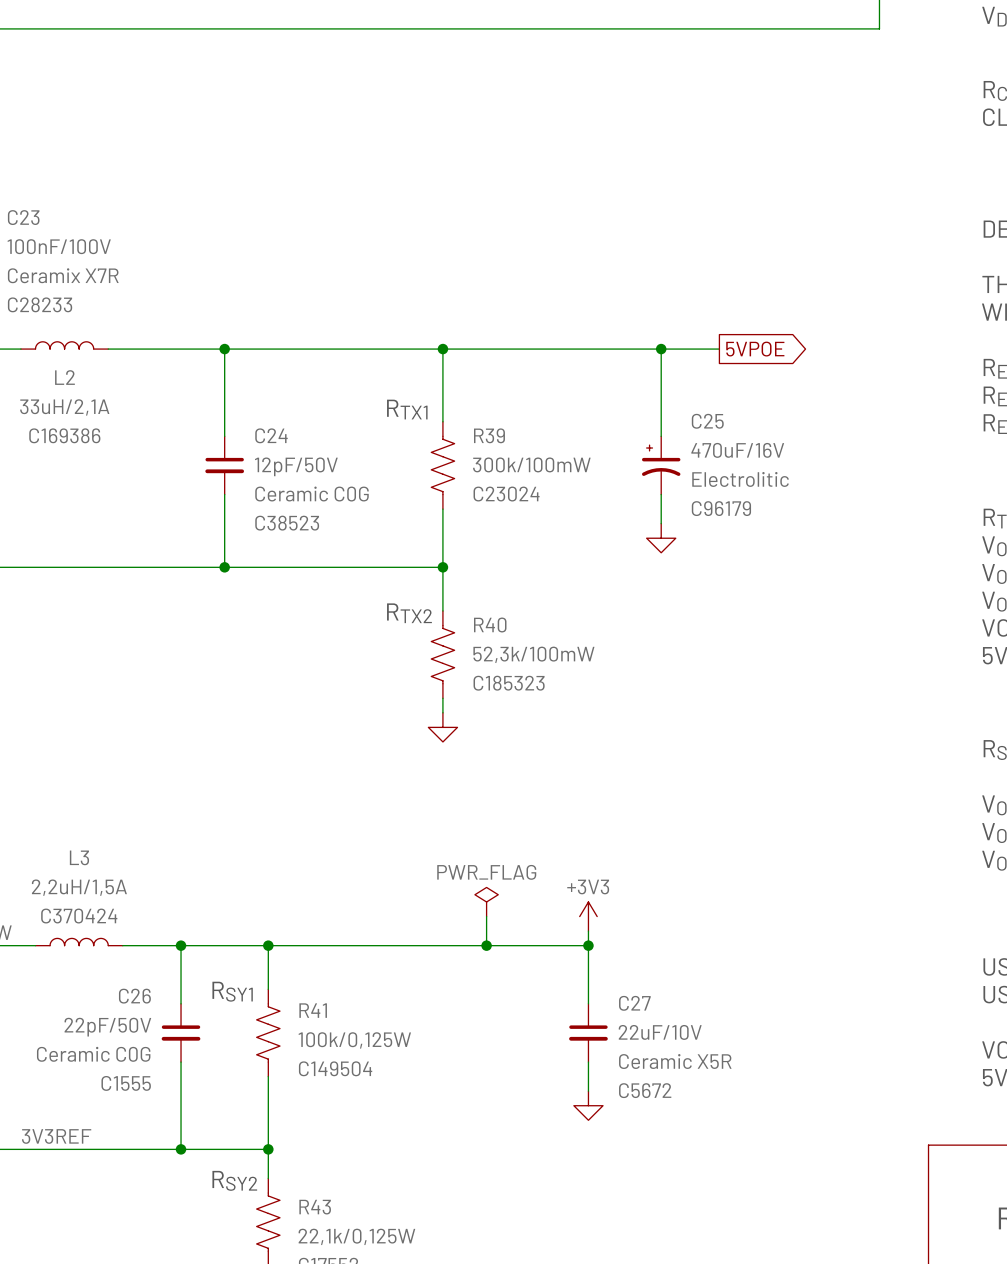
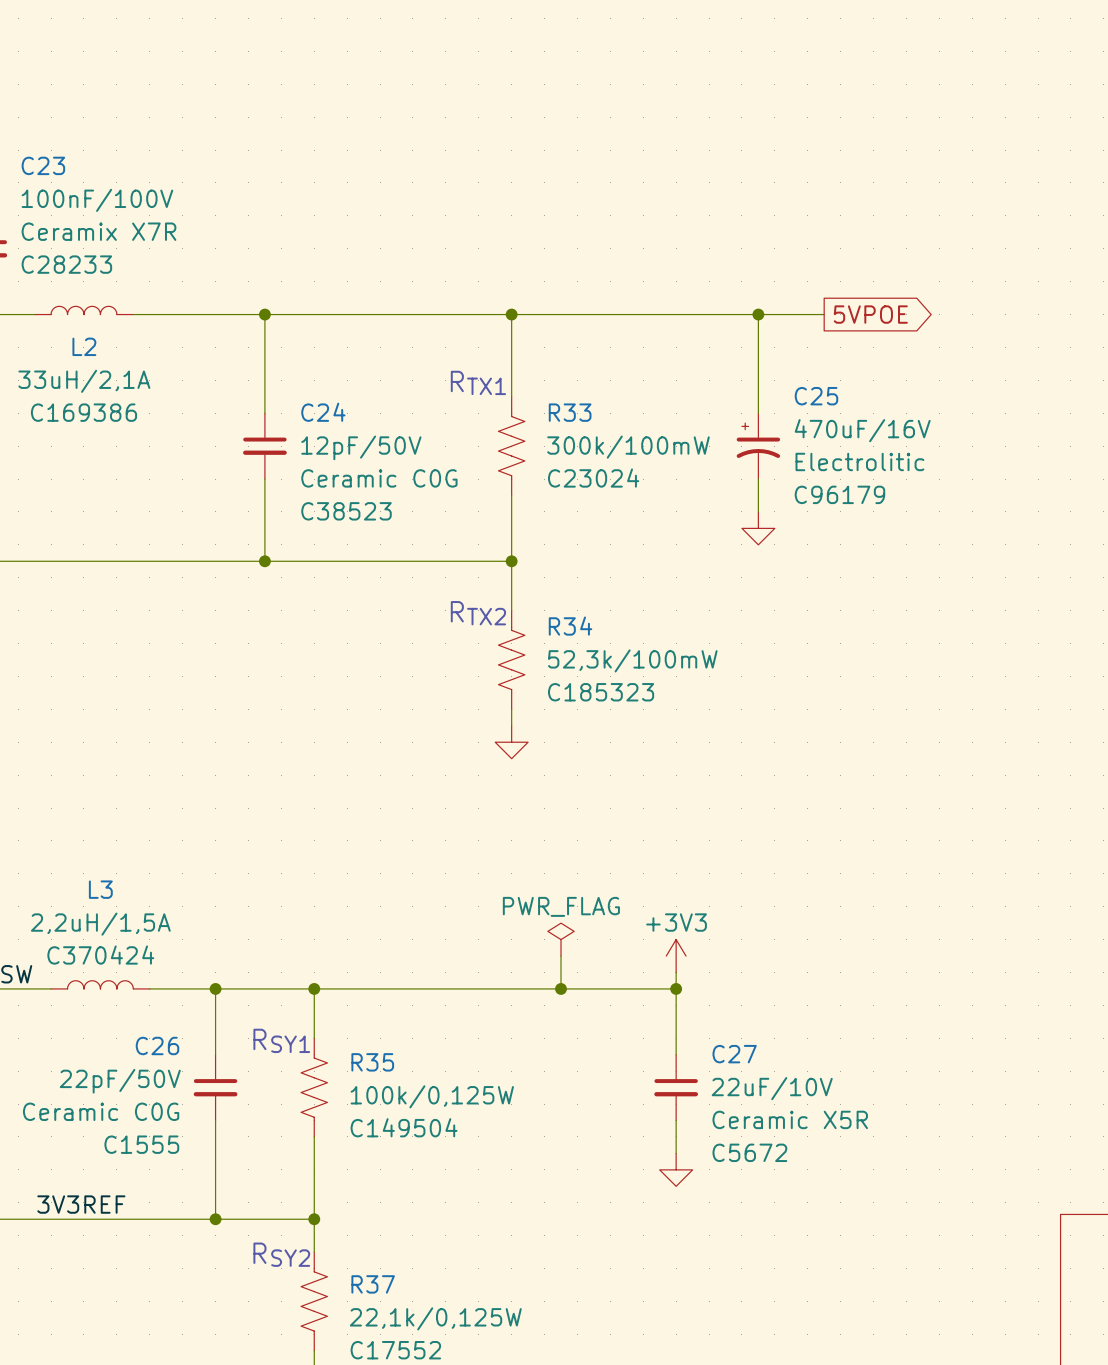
R39 name: R39 (489, 435) -> R33 (570, 412)
R40 name: R40 (490, 624) -> R34 (570, 626)
R41 name: R41 (313, 1010) -> R35 (372, 1062)
R43 name: R43 (315, 1207) -> R37 (373, 1284)

